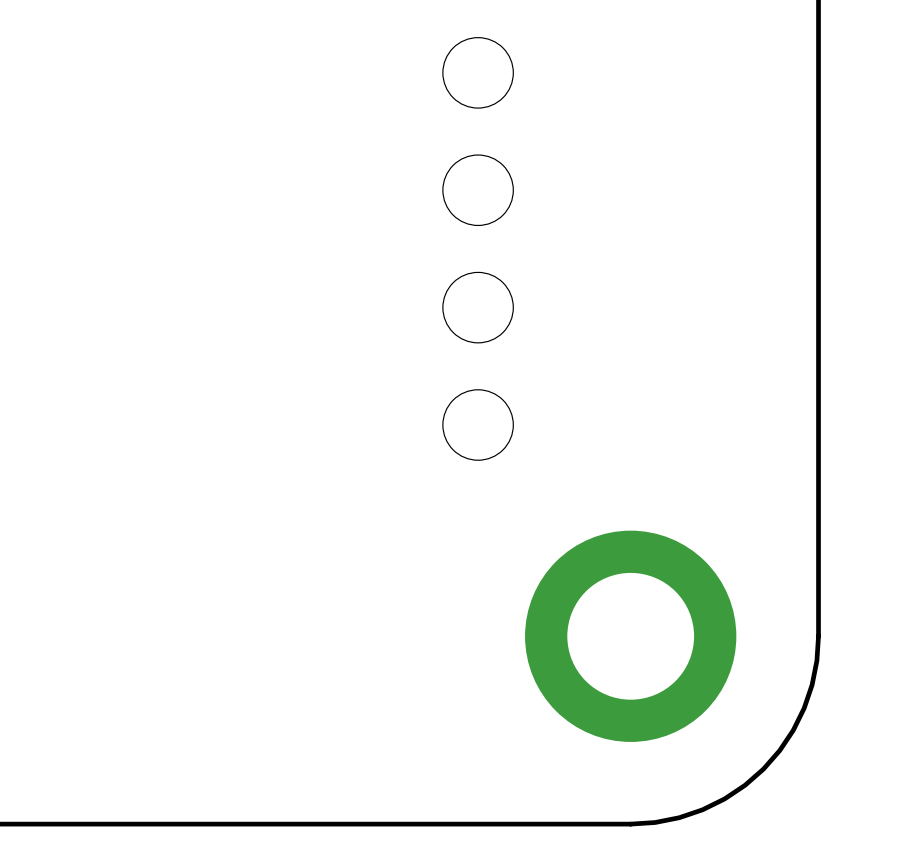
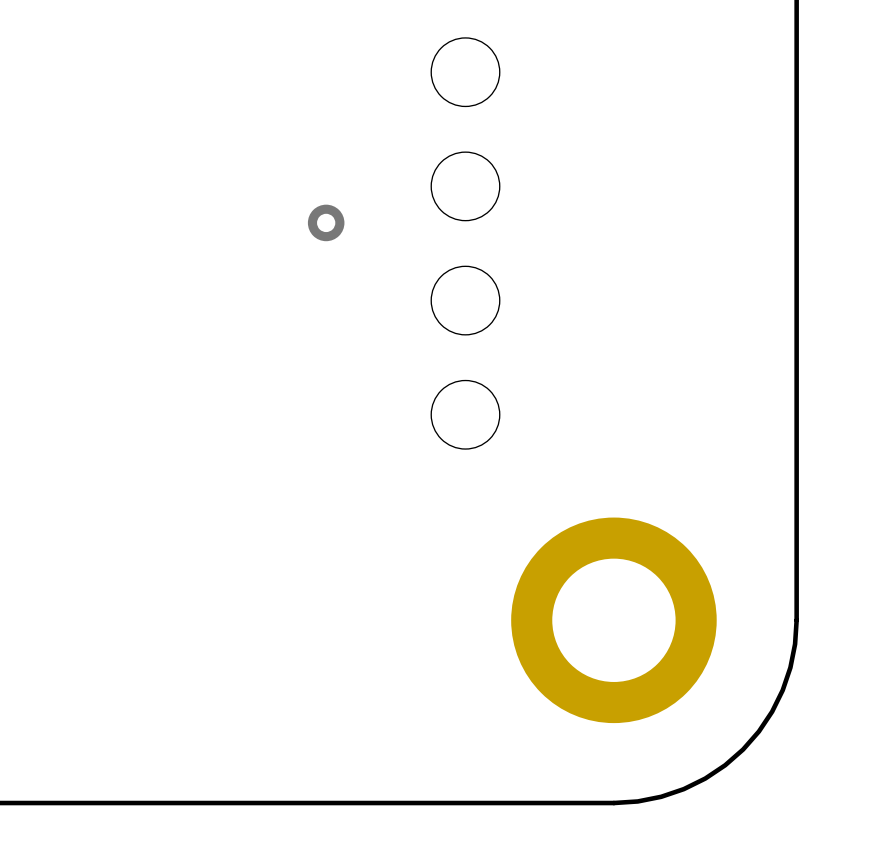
via: none -> (326, 222)

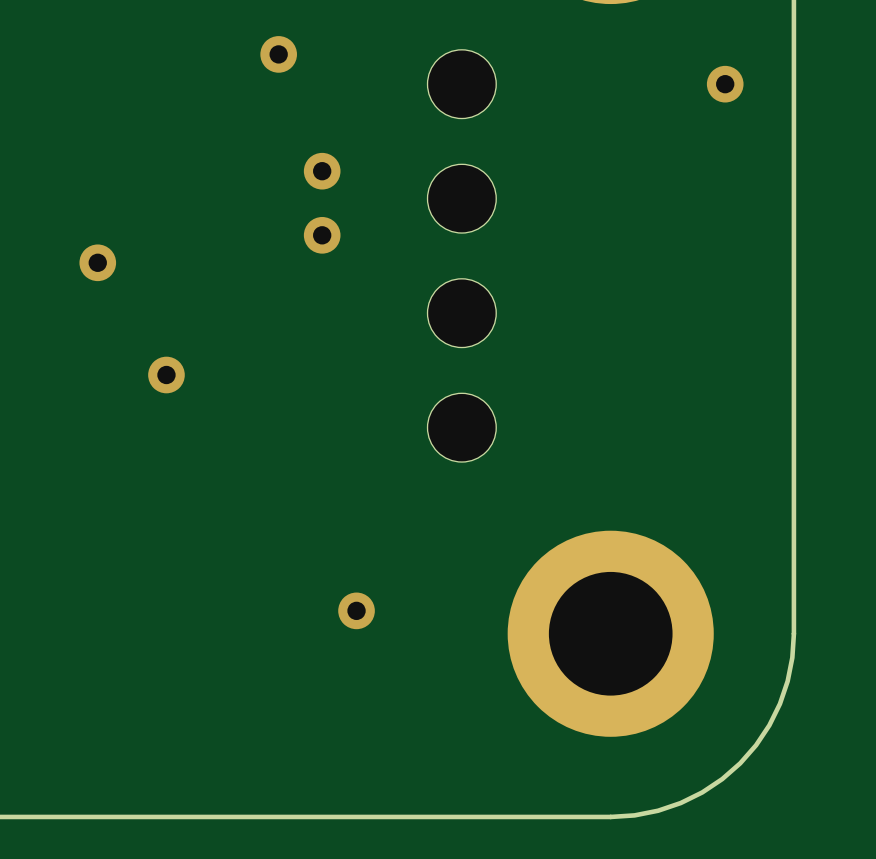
via: none -> (278, 54)
via: none -> (725, 84)
via: none -> (322, 171)
via: none -> (97, 262)
via: none -> (166, 375)
via: none -> (356, 610)

